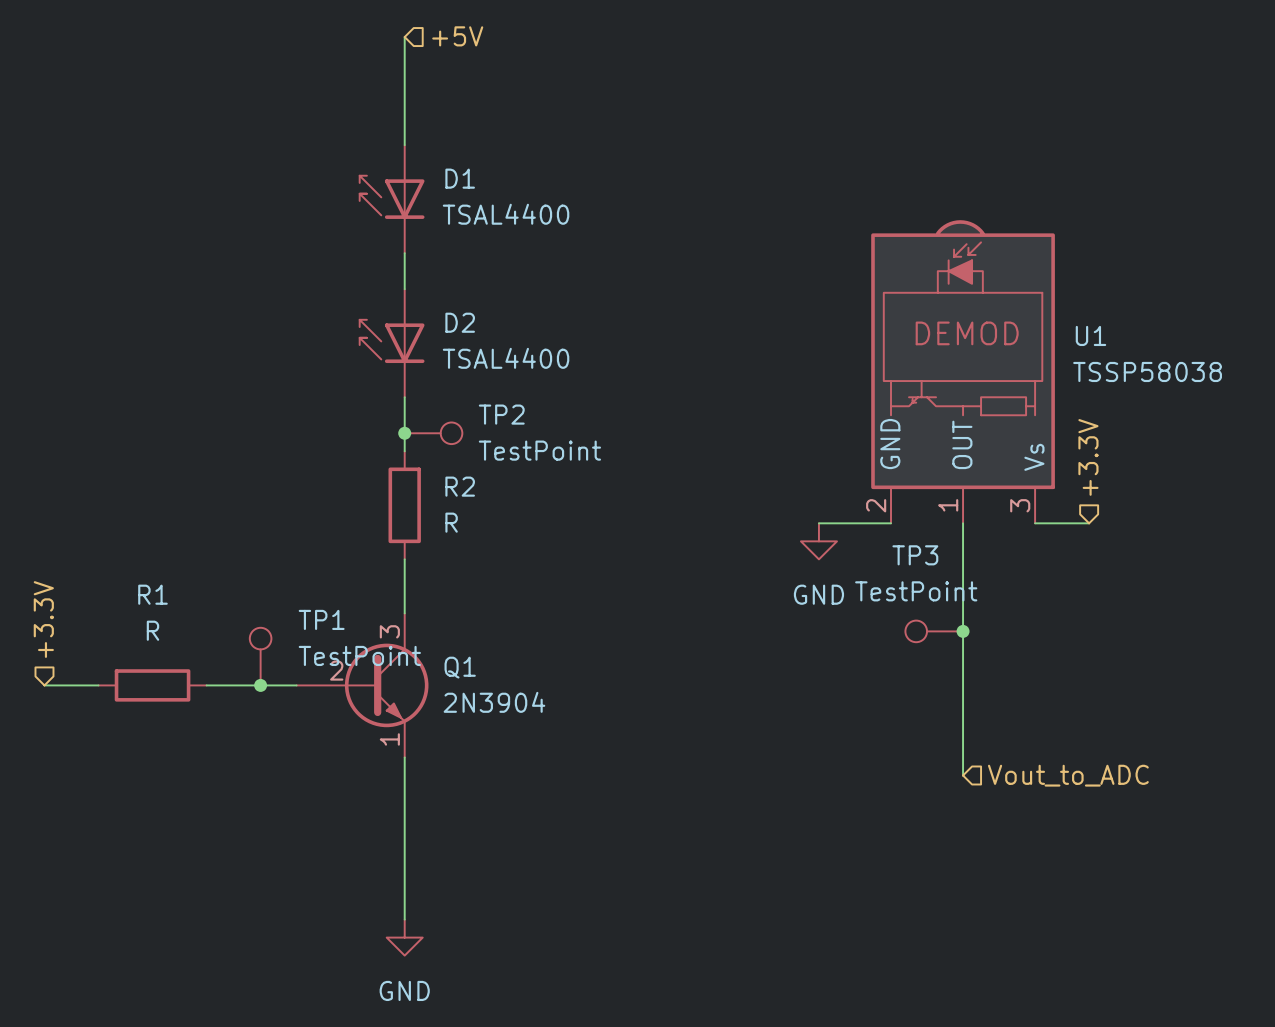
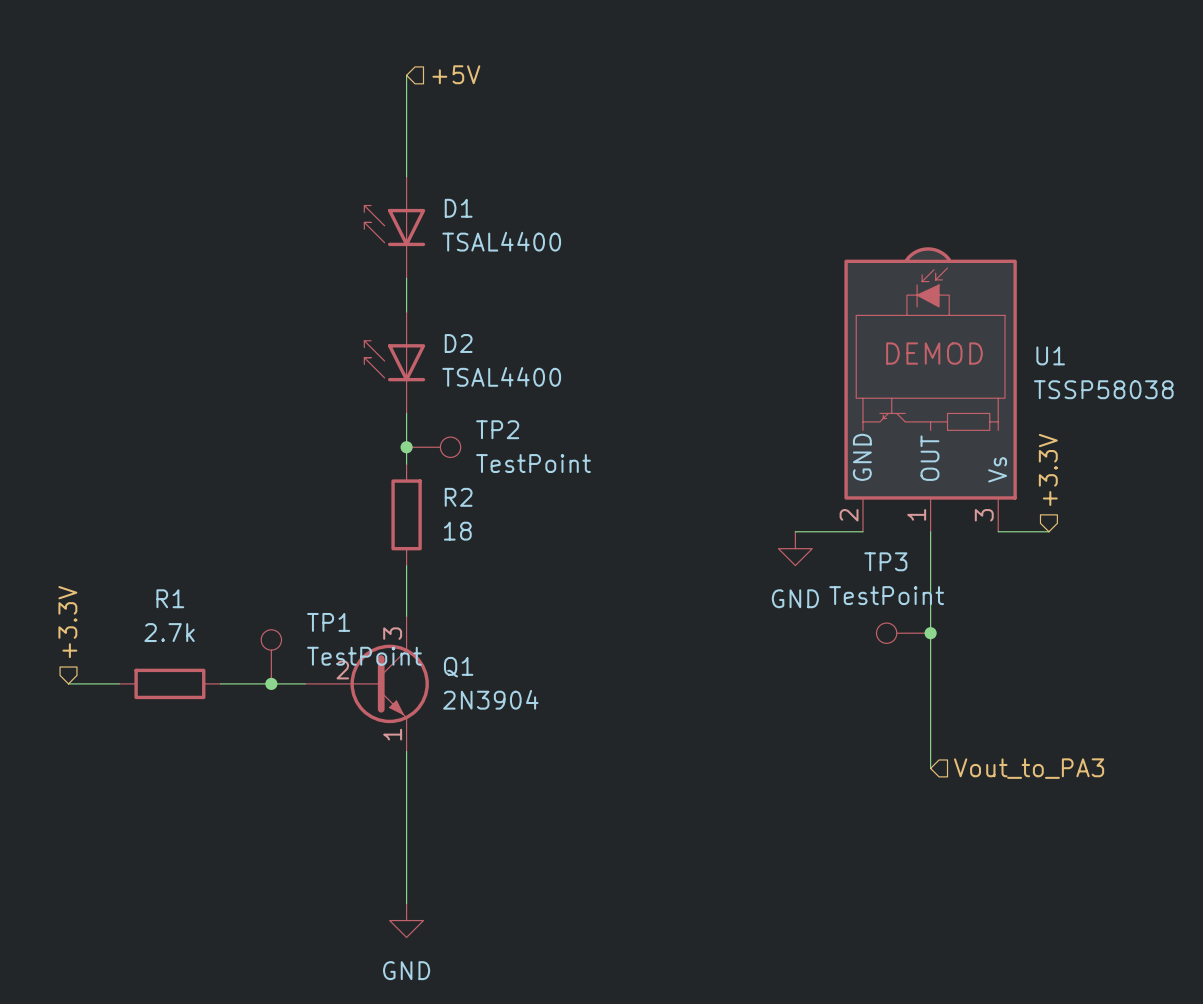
R2 value: R (451, 522) -> 18 (457, 531)
R1 value: R (152, 630) -> 2.7k (169, 632)
hierarchical label: Vout_to_ADC (1068, 775) -> Vout_to_PA3 (1029, 768)

